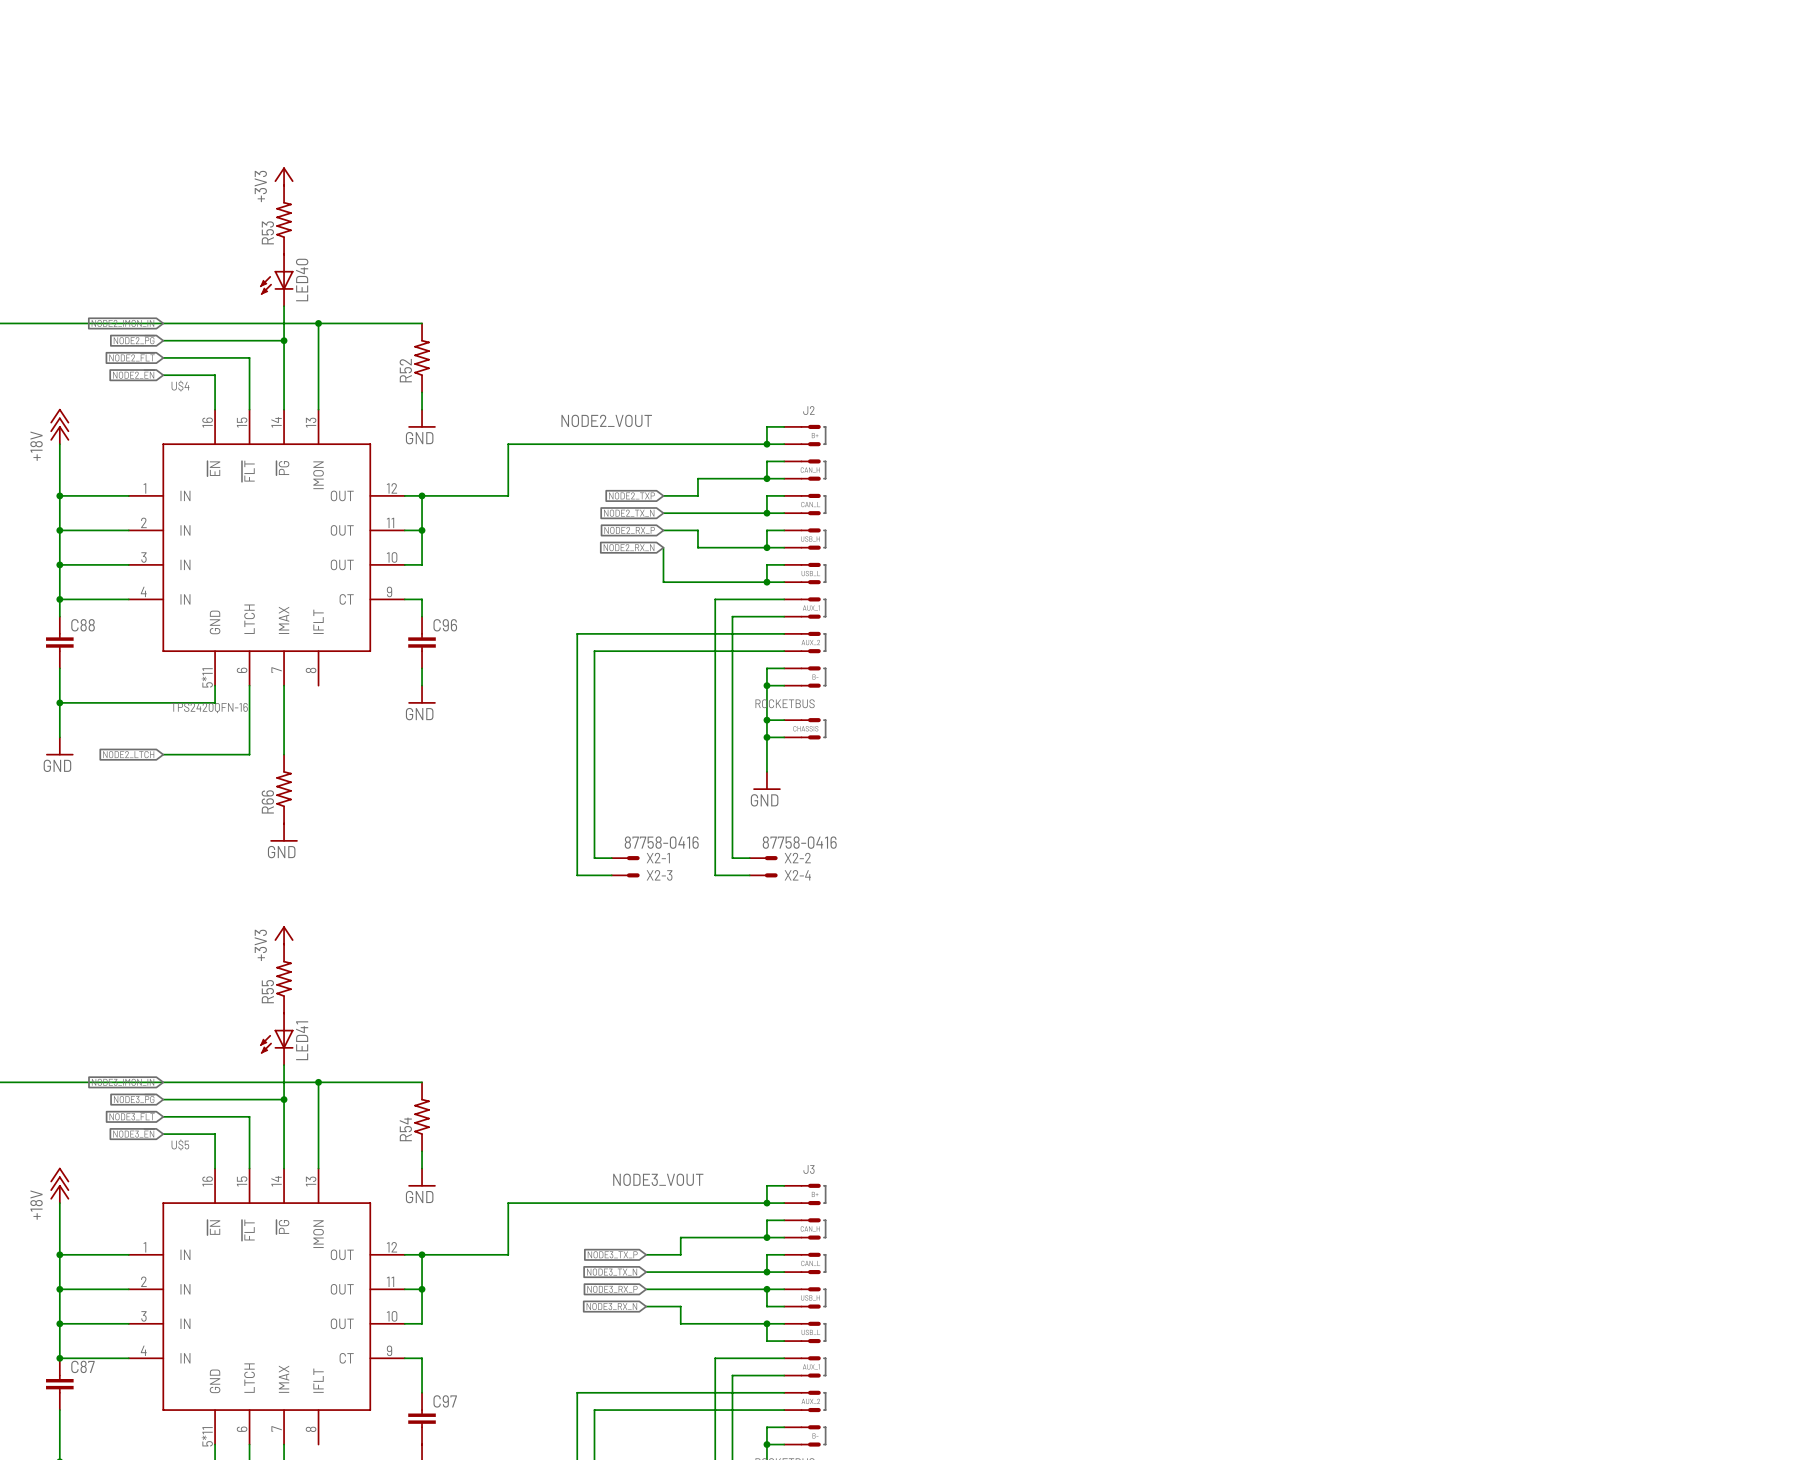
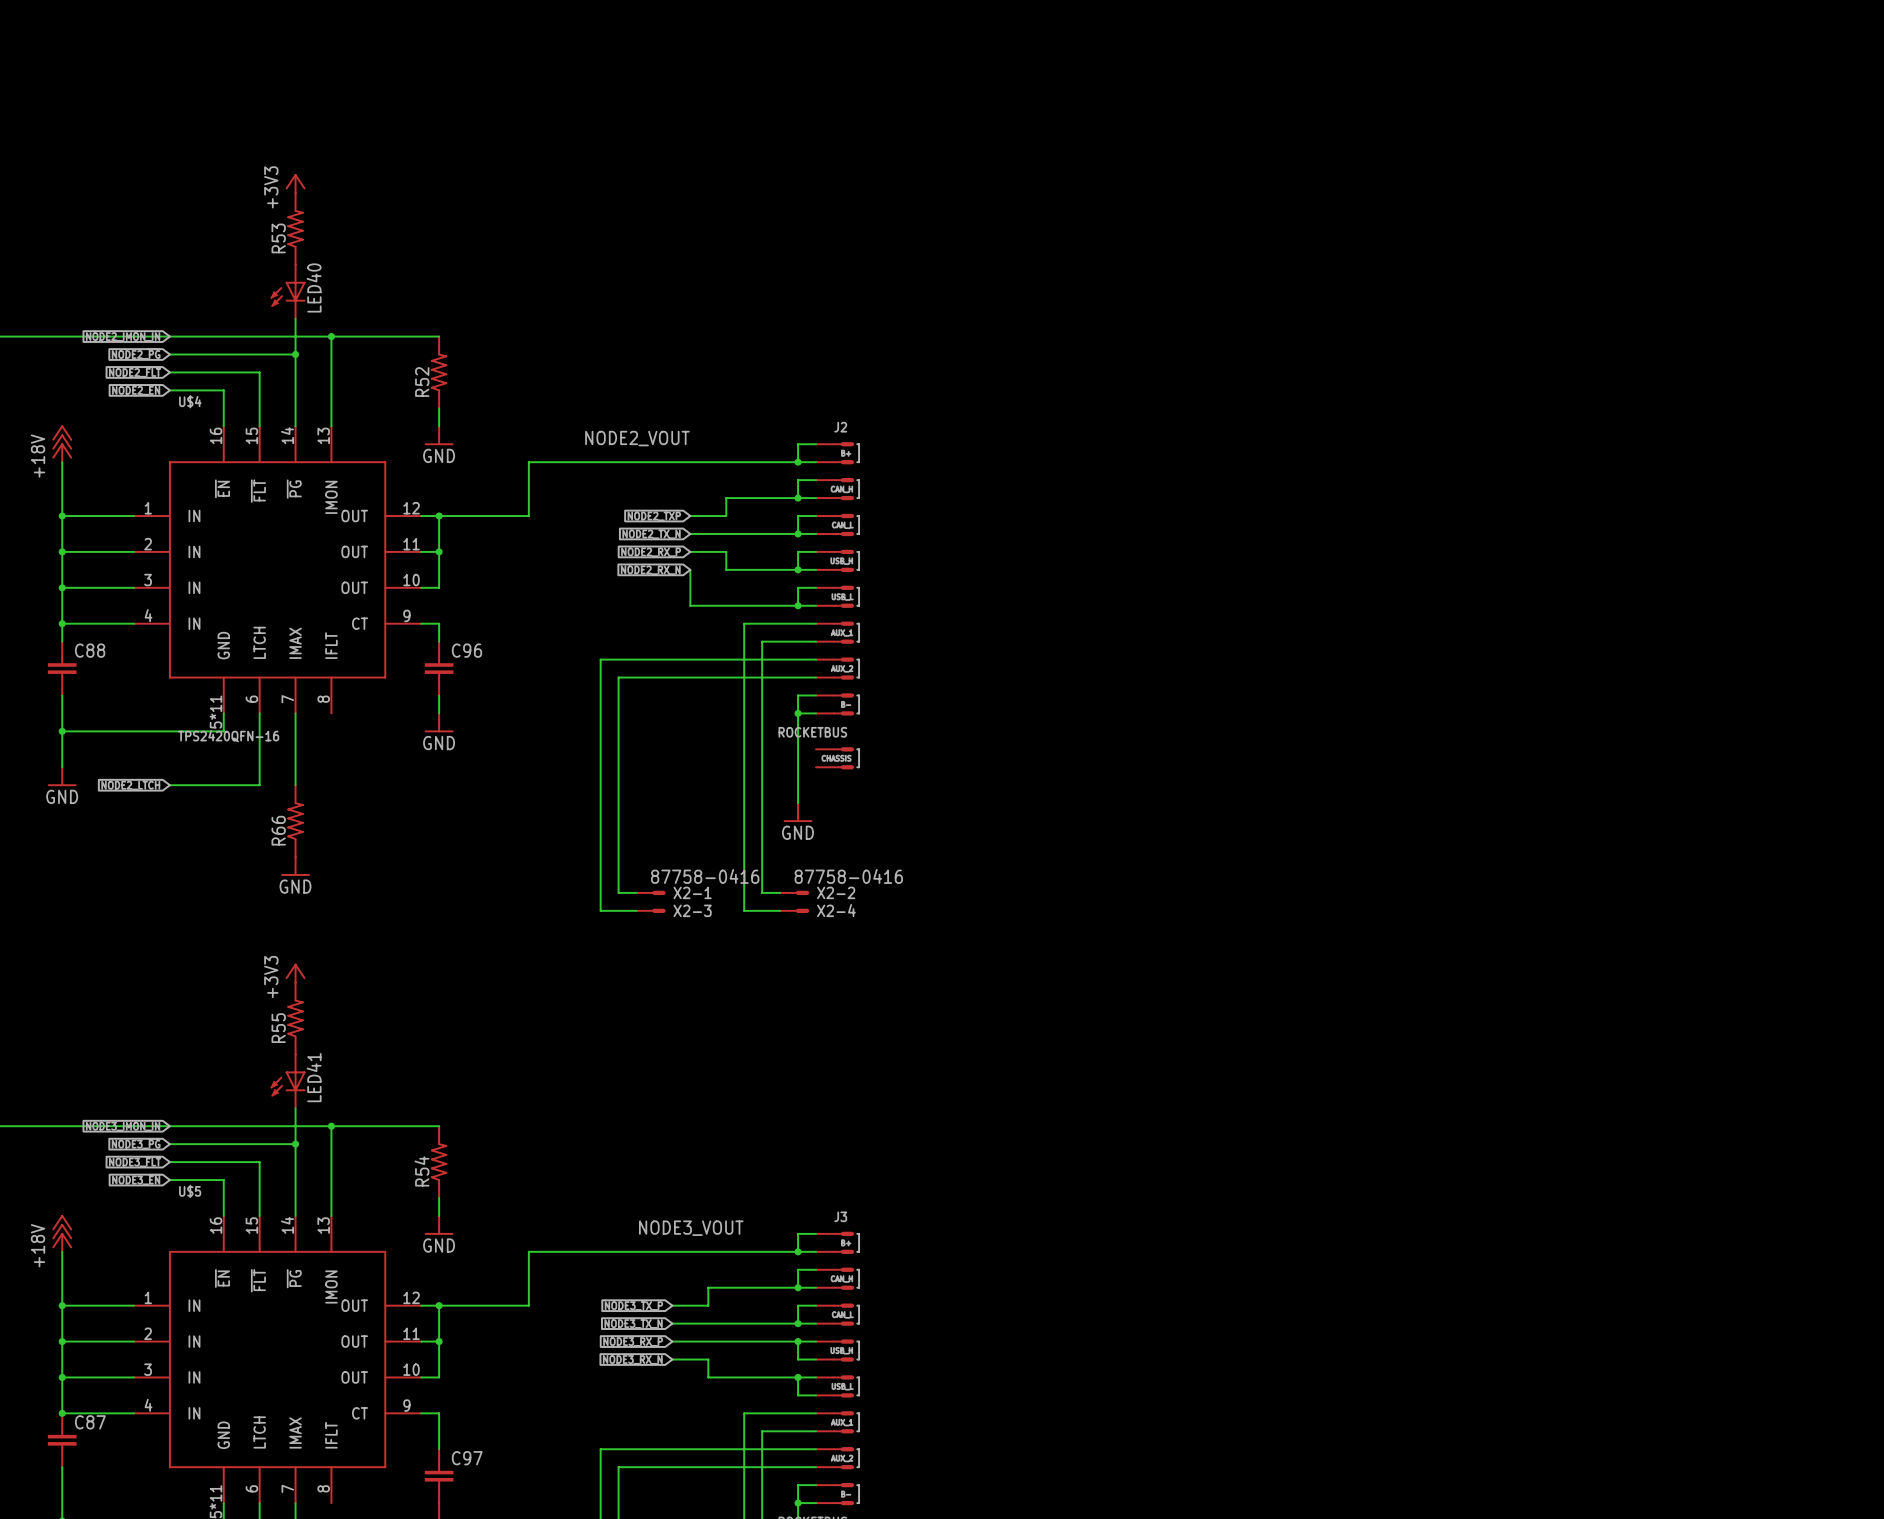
wire: (766, 720) (784, 720) -> none
junction: (766, 720) -> none
wire: (766, 737) (784, 737) -> none
junction: (766, 737) -> none

